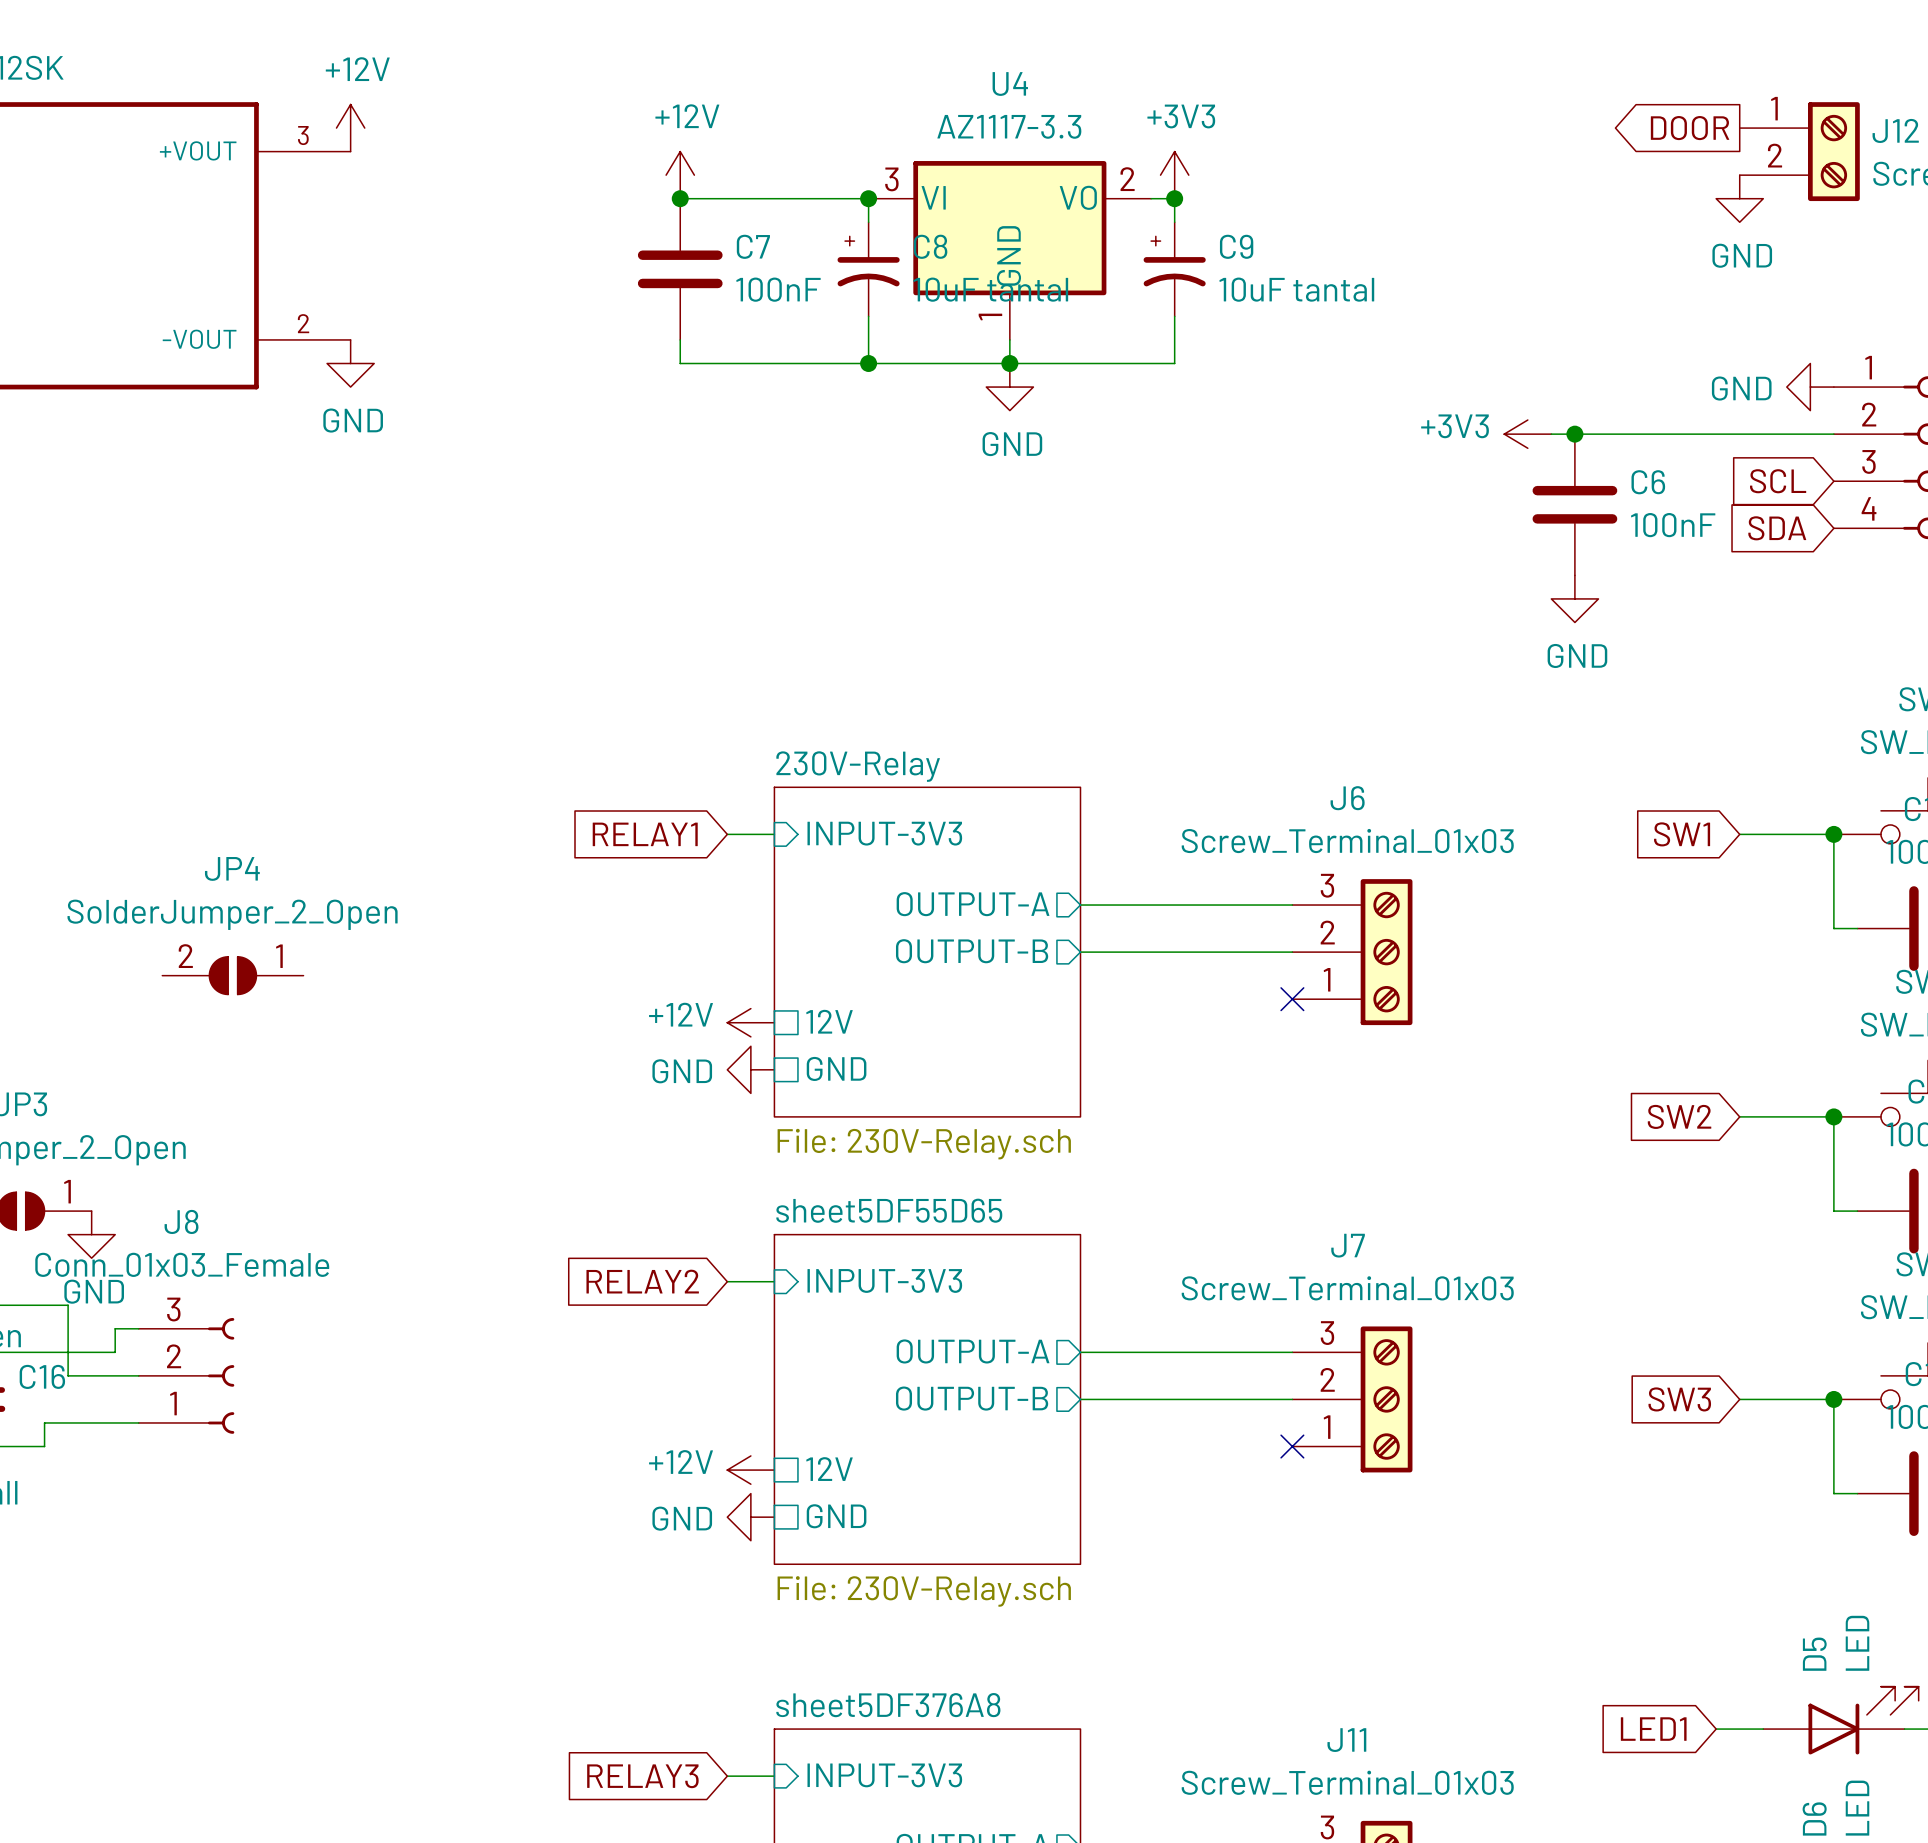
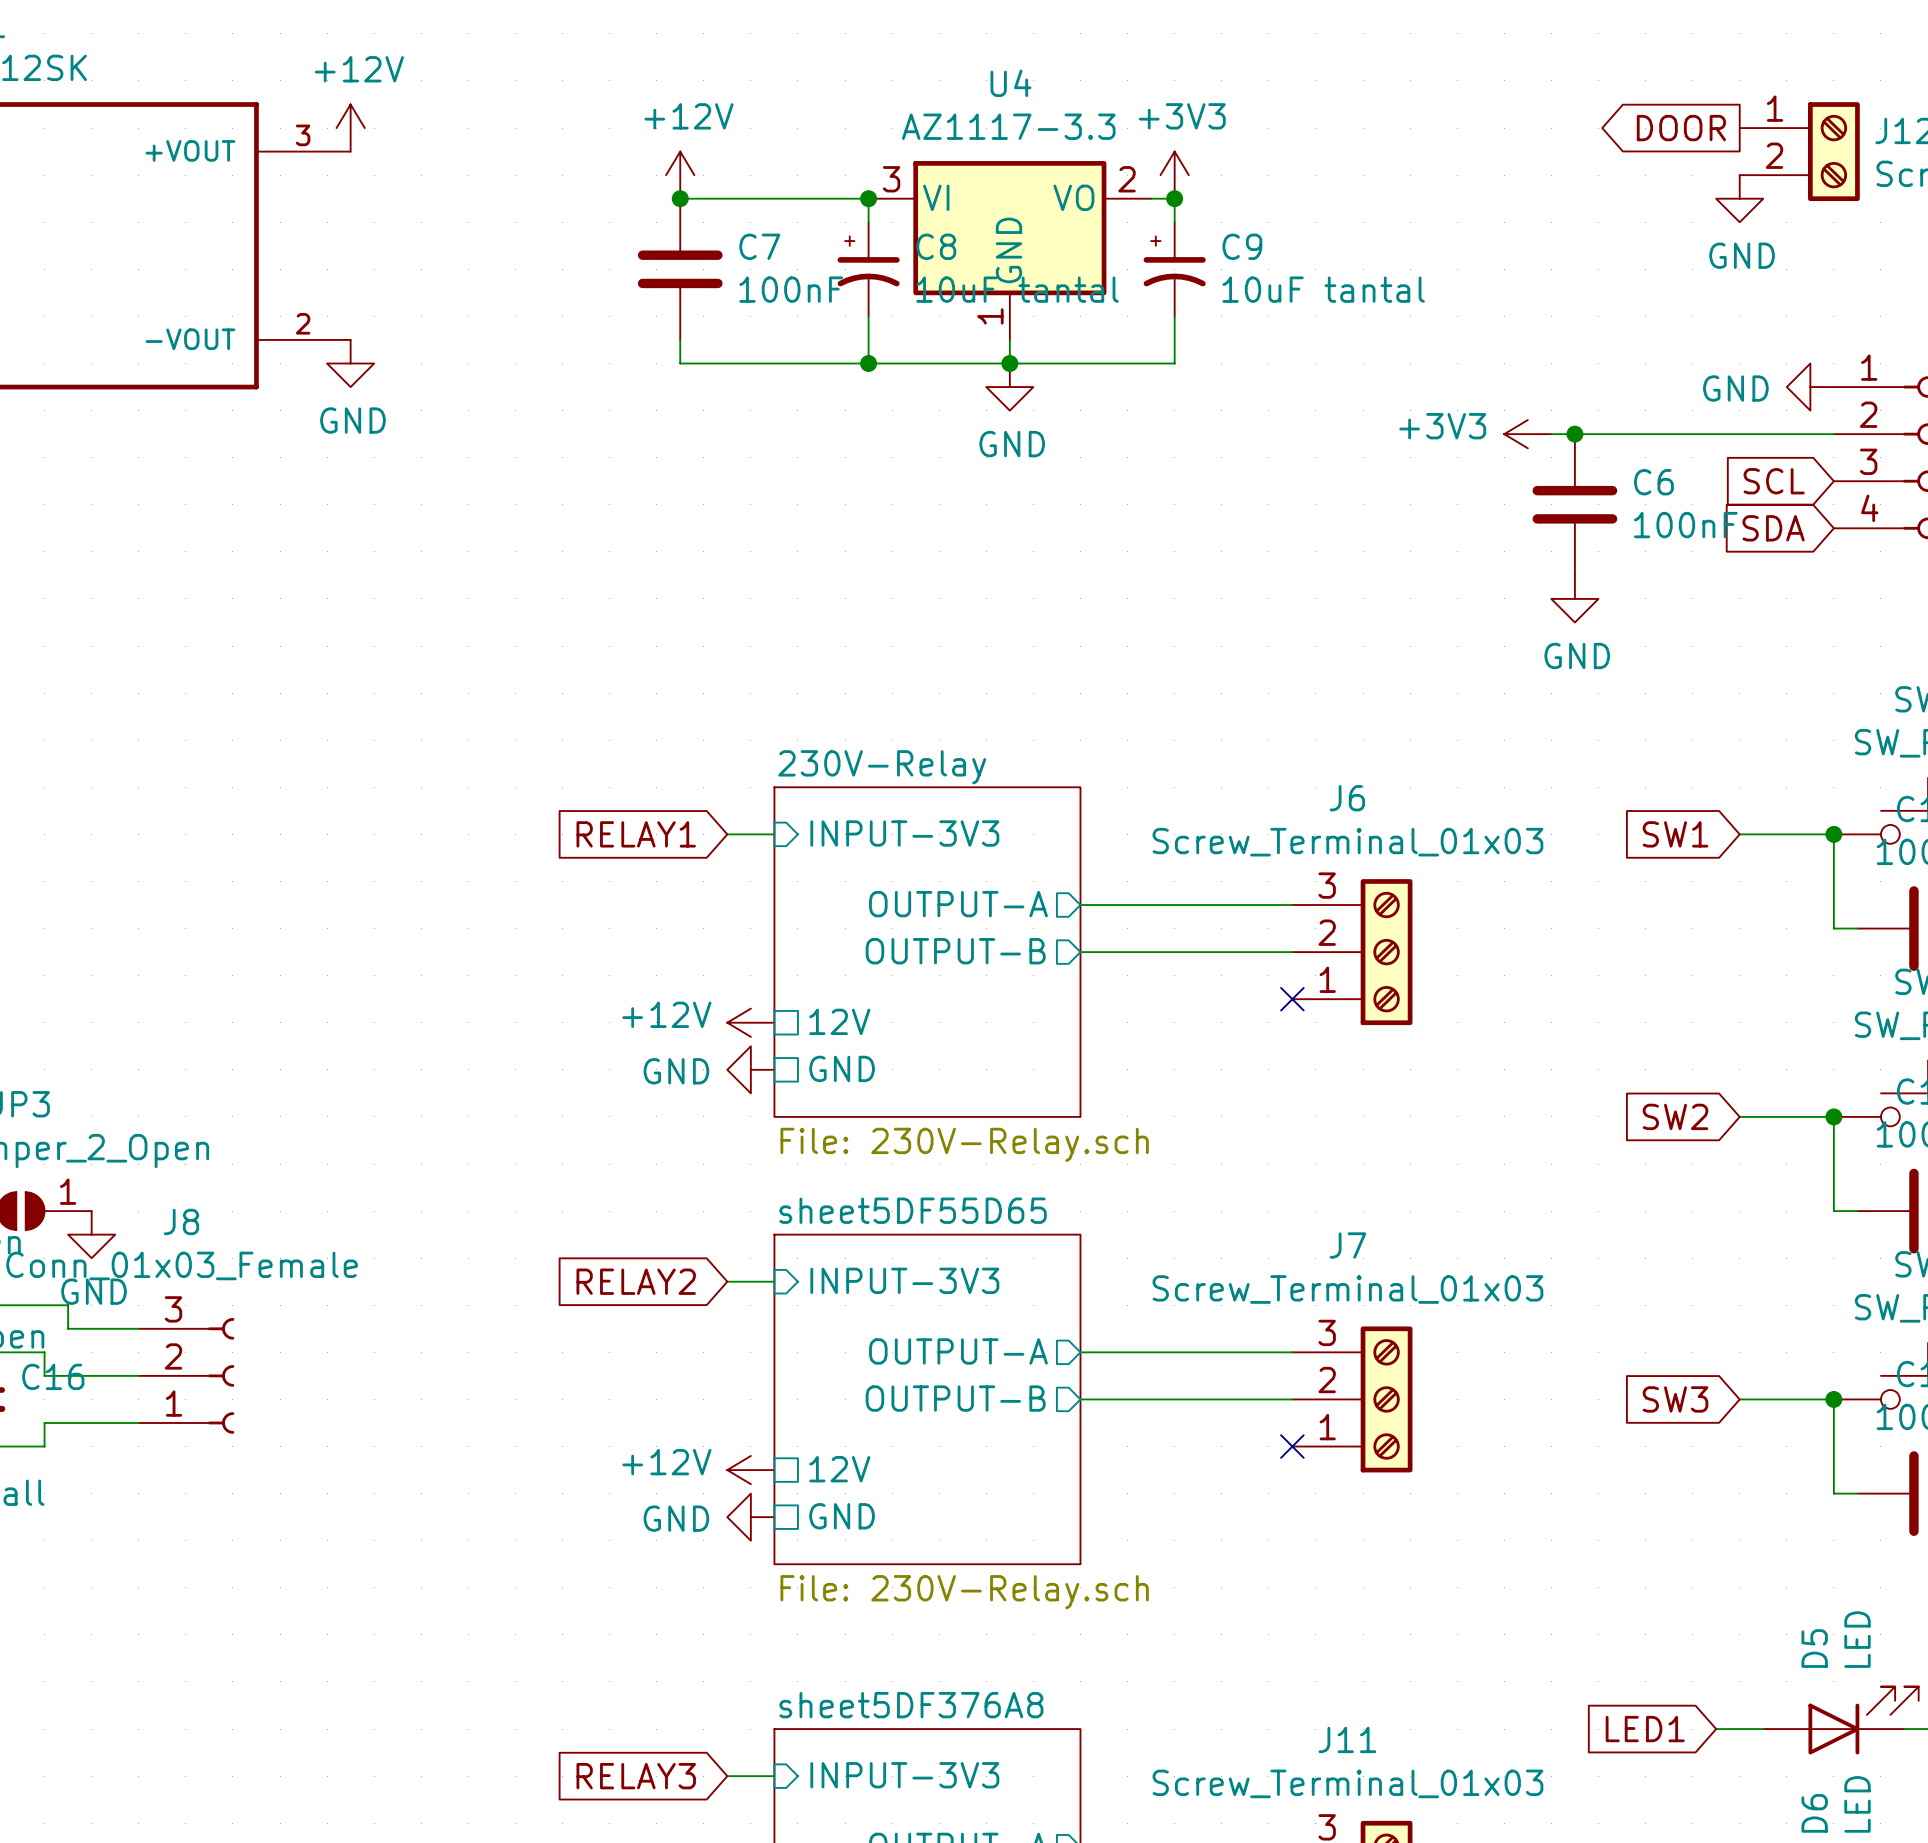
JP4: SolderJumper_2_Open (232, 975) -> none
wire: (68, 1328) (68, 1375) -> (44, 1352) (44, 1375) (68, 1375)
wire: (115, 1328) (115, 1352) (44, 1352) -> (115, 1328) (68, 1328)

